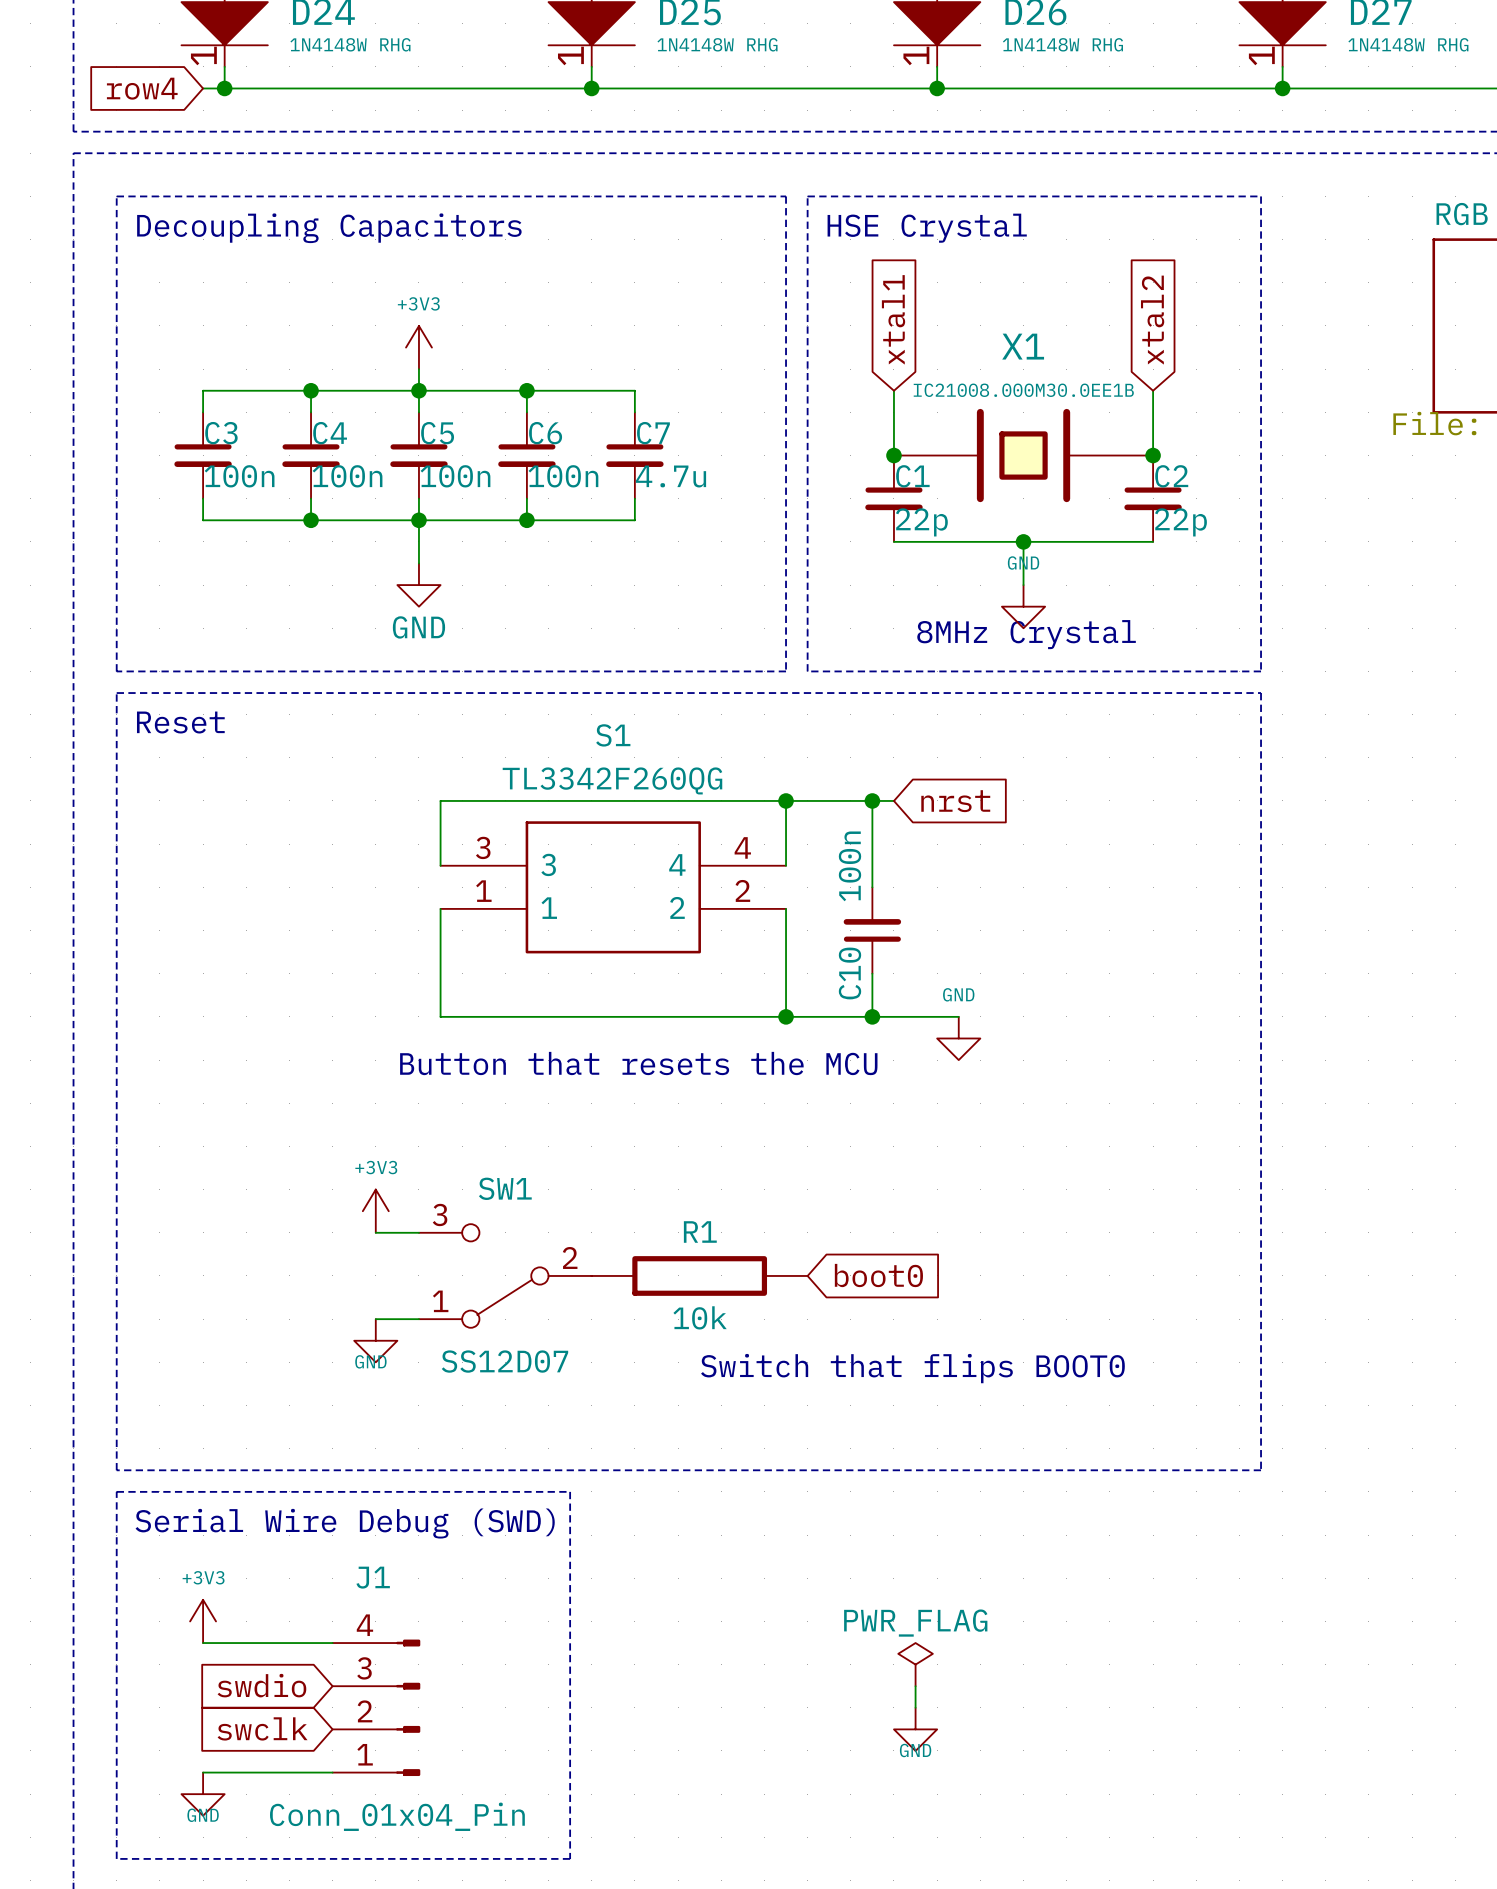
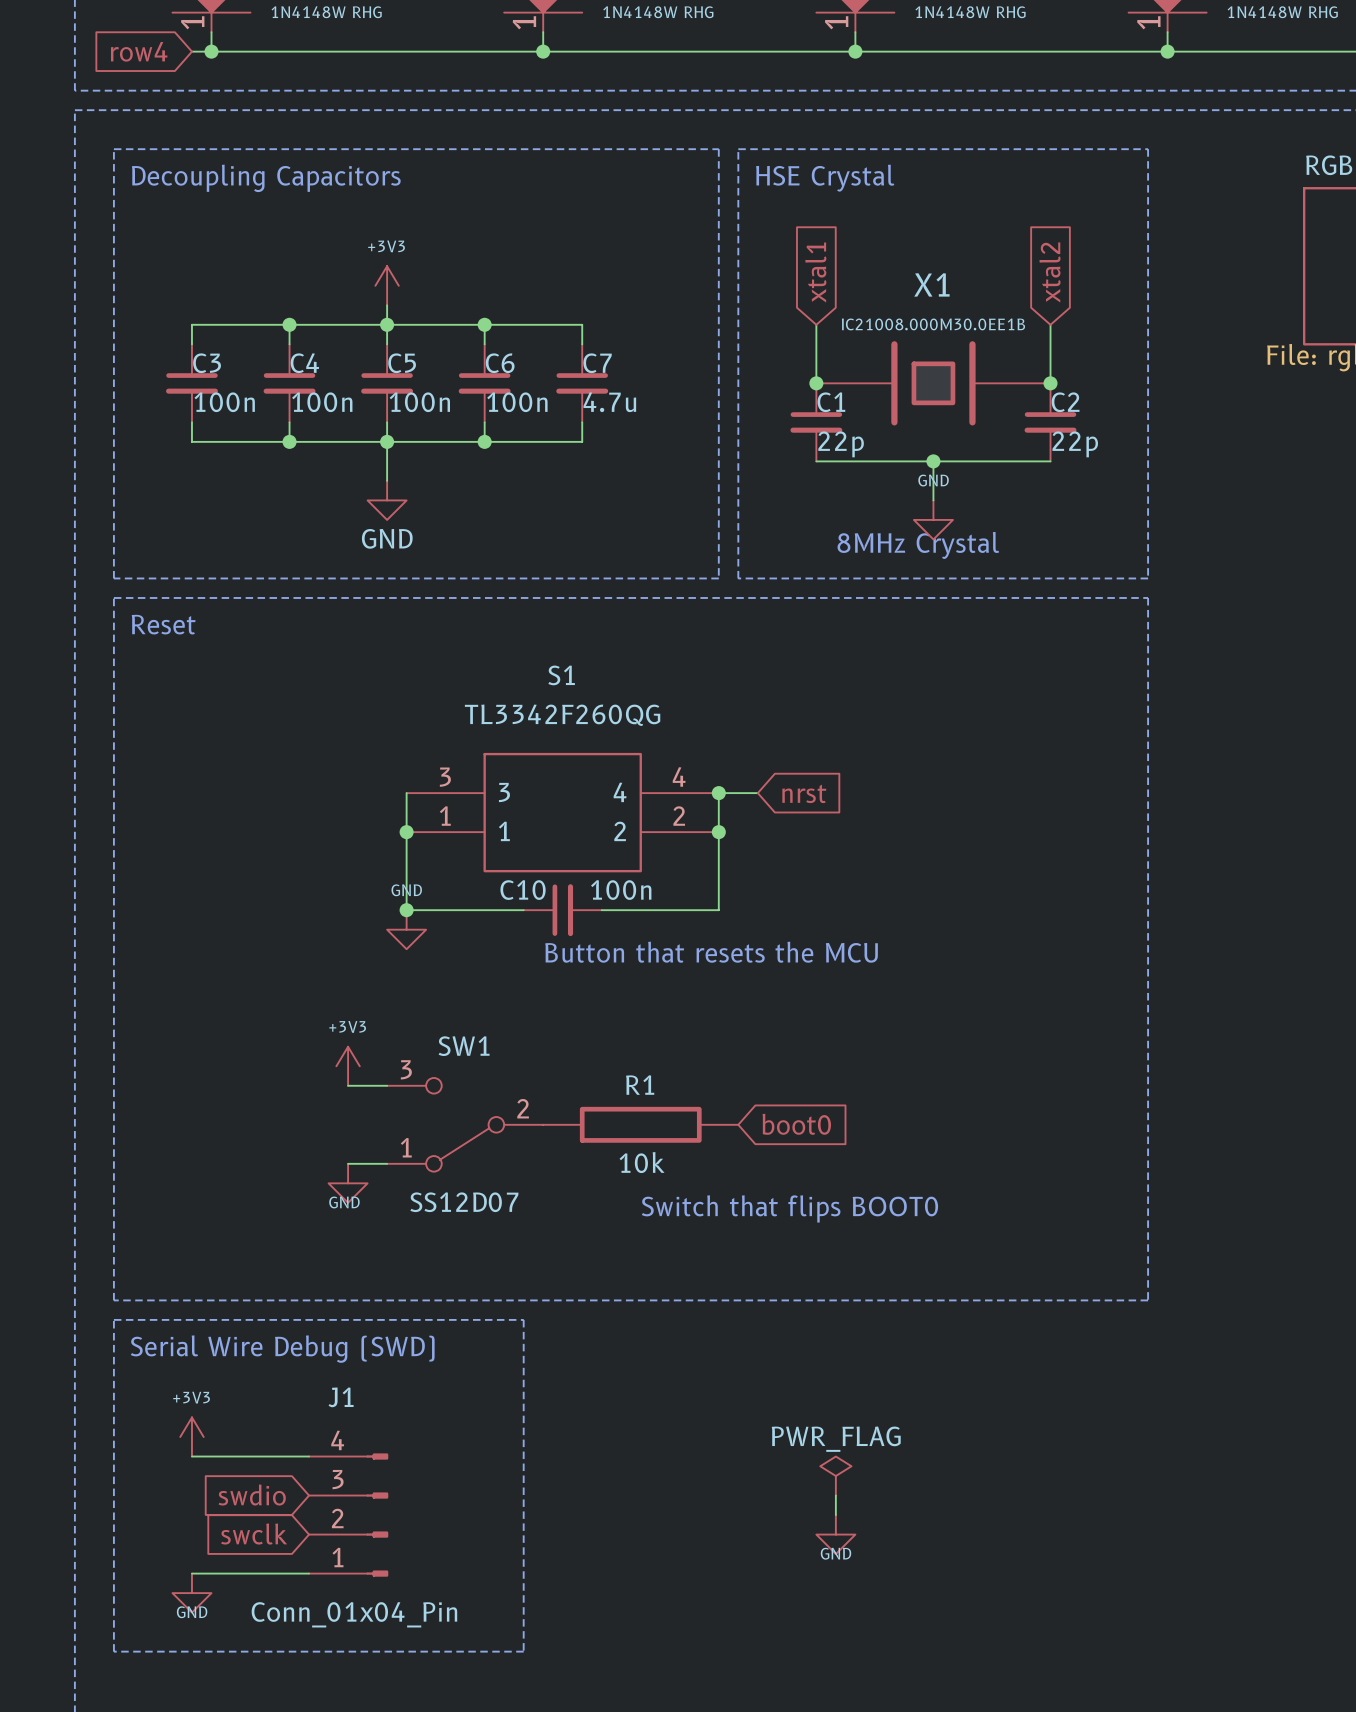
wire: (786, 800) (786, 865) -> none
junction: (786, 800) -> none
wire: (872, 800) (872, 887) -> none
junction: (872, 800) -> none
wire: (893, 800) (440, 800) (440, 865) -> none
global label position: nrst (955, 801) -> nrst (804, 793)
S1 position: (613, 887) -> (562, 812)
wire: none -> (718, 793) (757, 793)
junction: none -> (718, 793)
C10 rotation: 0° (872, 930) -> 90° clockwise (562, 910)
C10 position: (872, 930) -> (562, 910)
junction: none -> (406, 832)
junction: none -> (718, 832)
wire: (872, 973) (872, 1016) -> none
wire: (440, 1016) (958, 1016) -> (406, 890) (406, 910) (523, 910)
wire: none -> (718, 890) (718, 910) (601, 910)
junction: (786, 1016) -> none
junction: (872, 1016) -> none
junction: none -> (406, 910)
power symbol: GND (958, 1038) -> none
power symbol: none -> GND (406, 929)
text position: Button that resets the MCU (638, 1063) -> Button that resets the MCU (711, 952)

